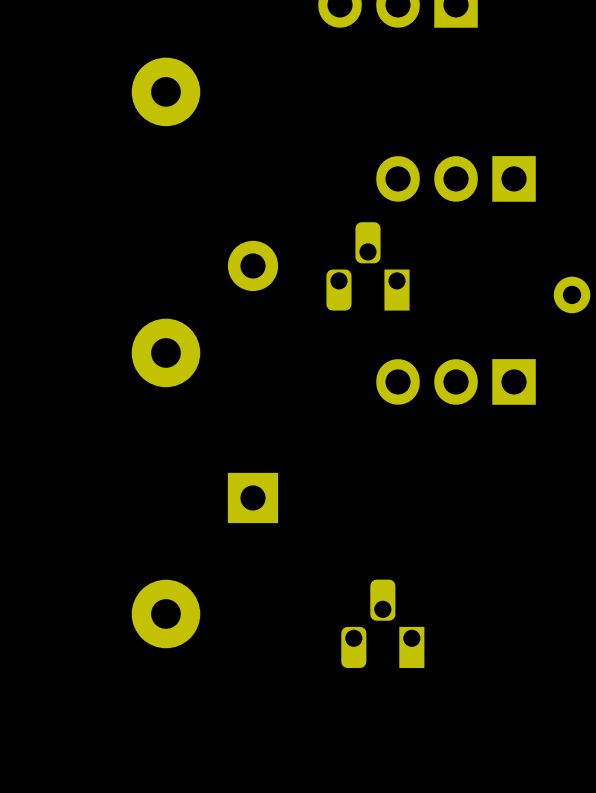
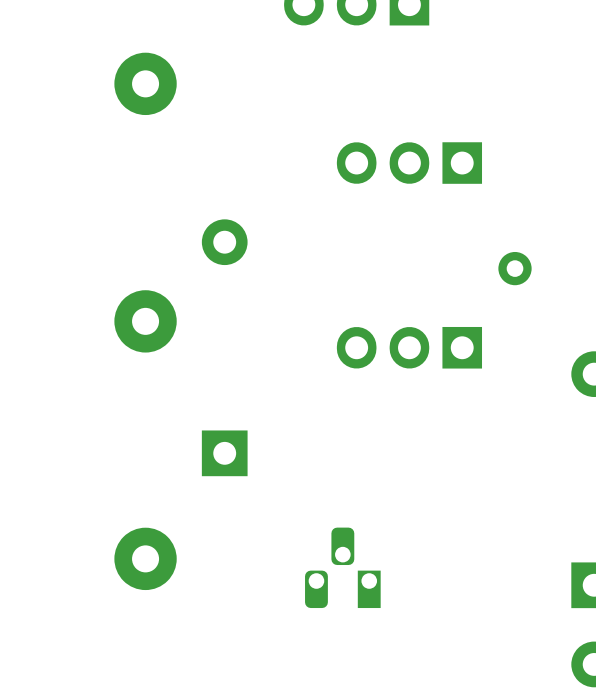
part: (367, 266) -> none

